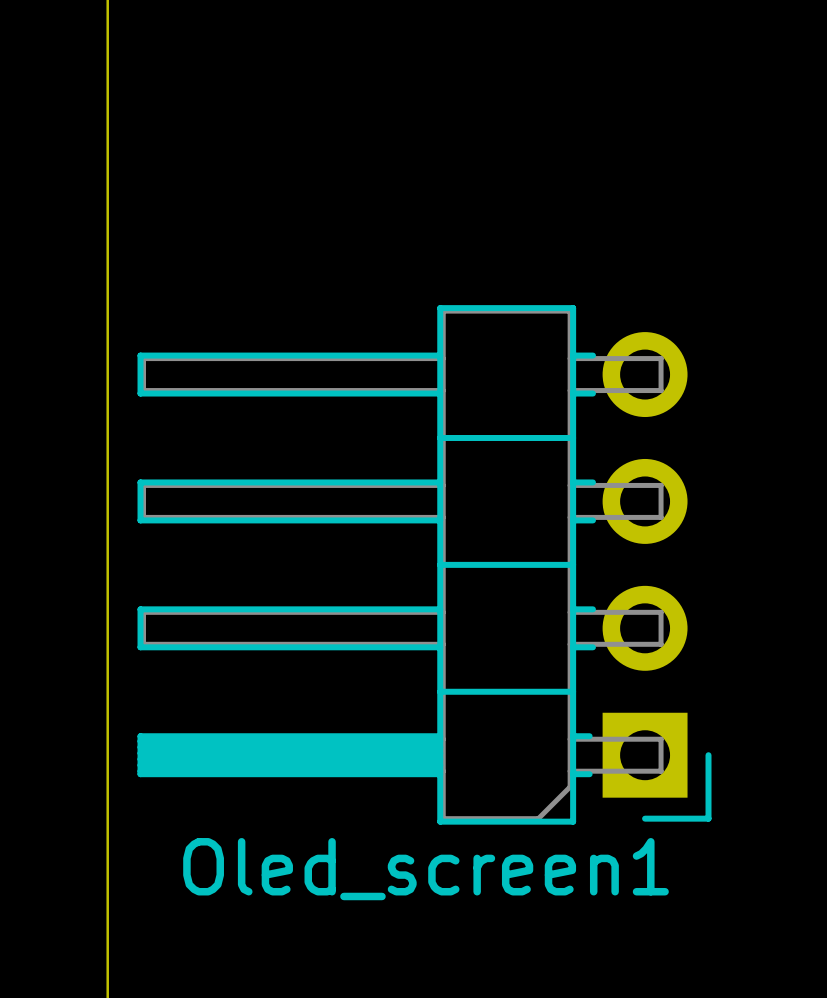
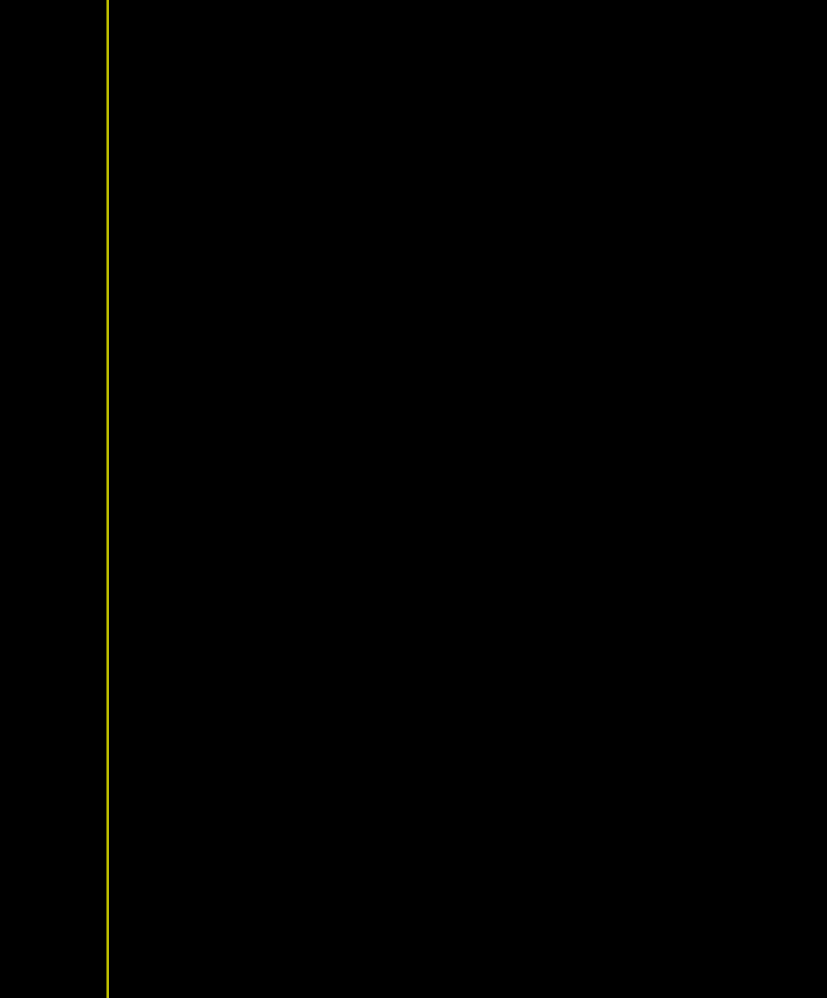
Oled_screen1: (424, 564) -> none

